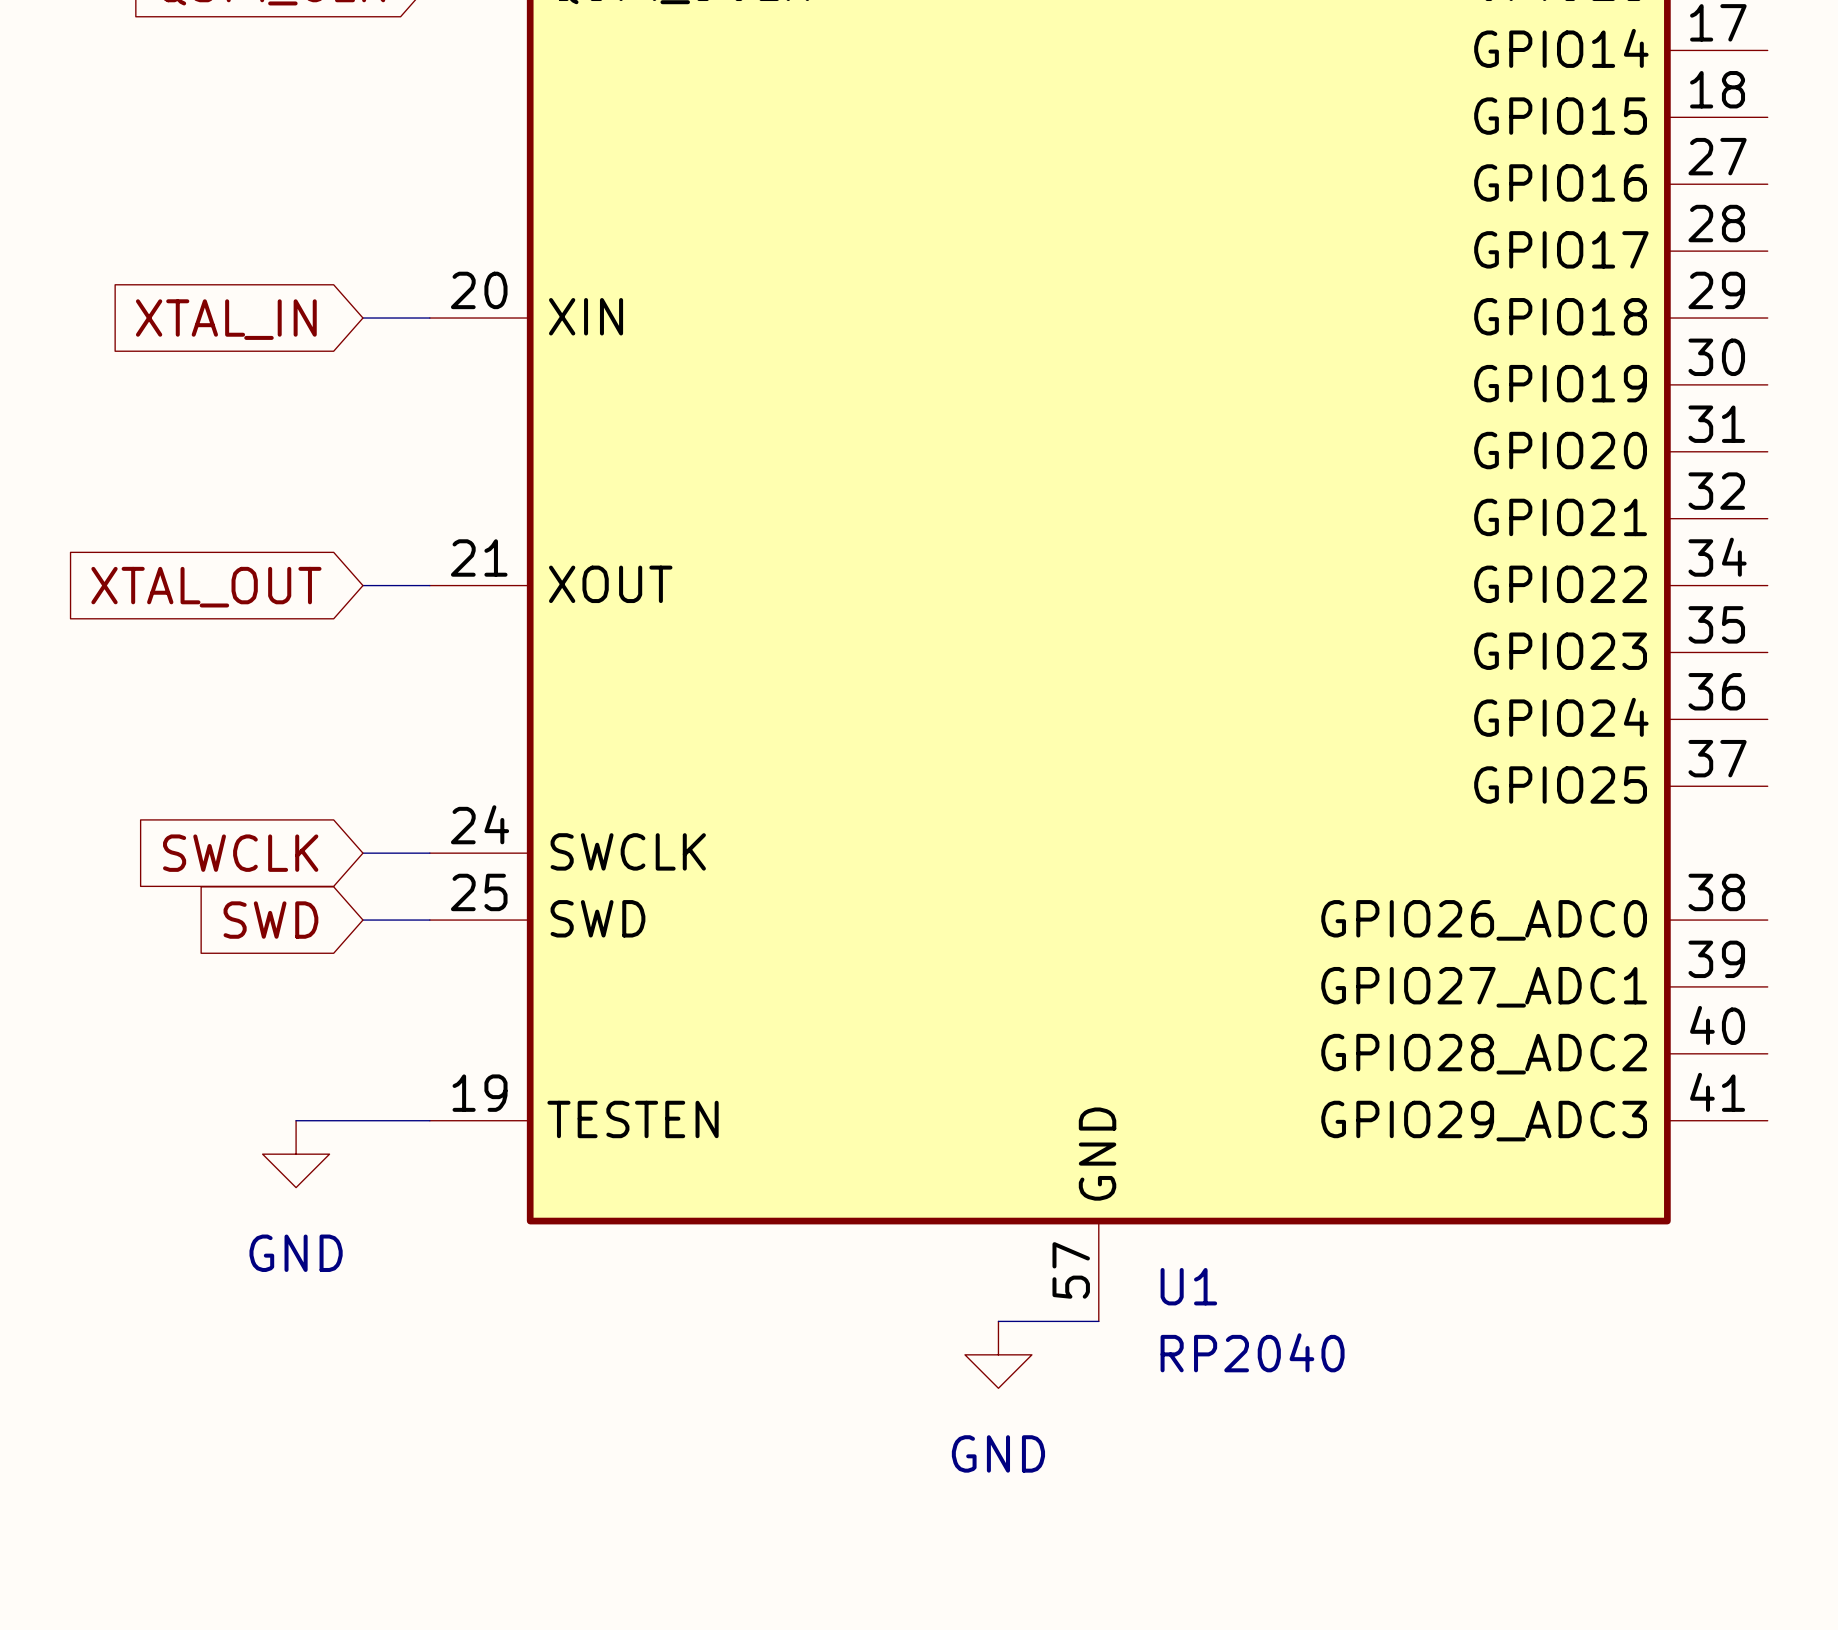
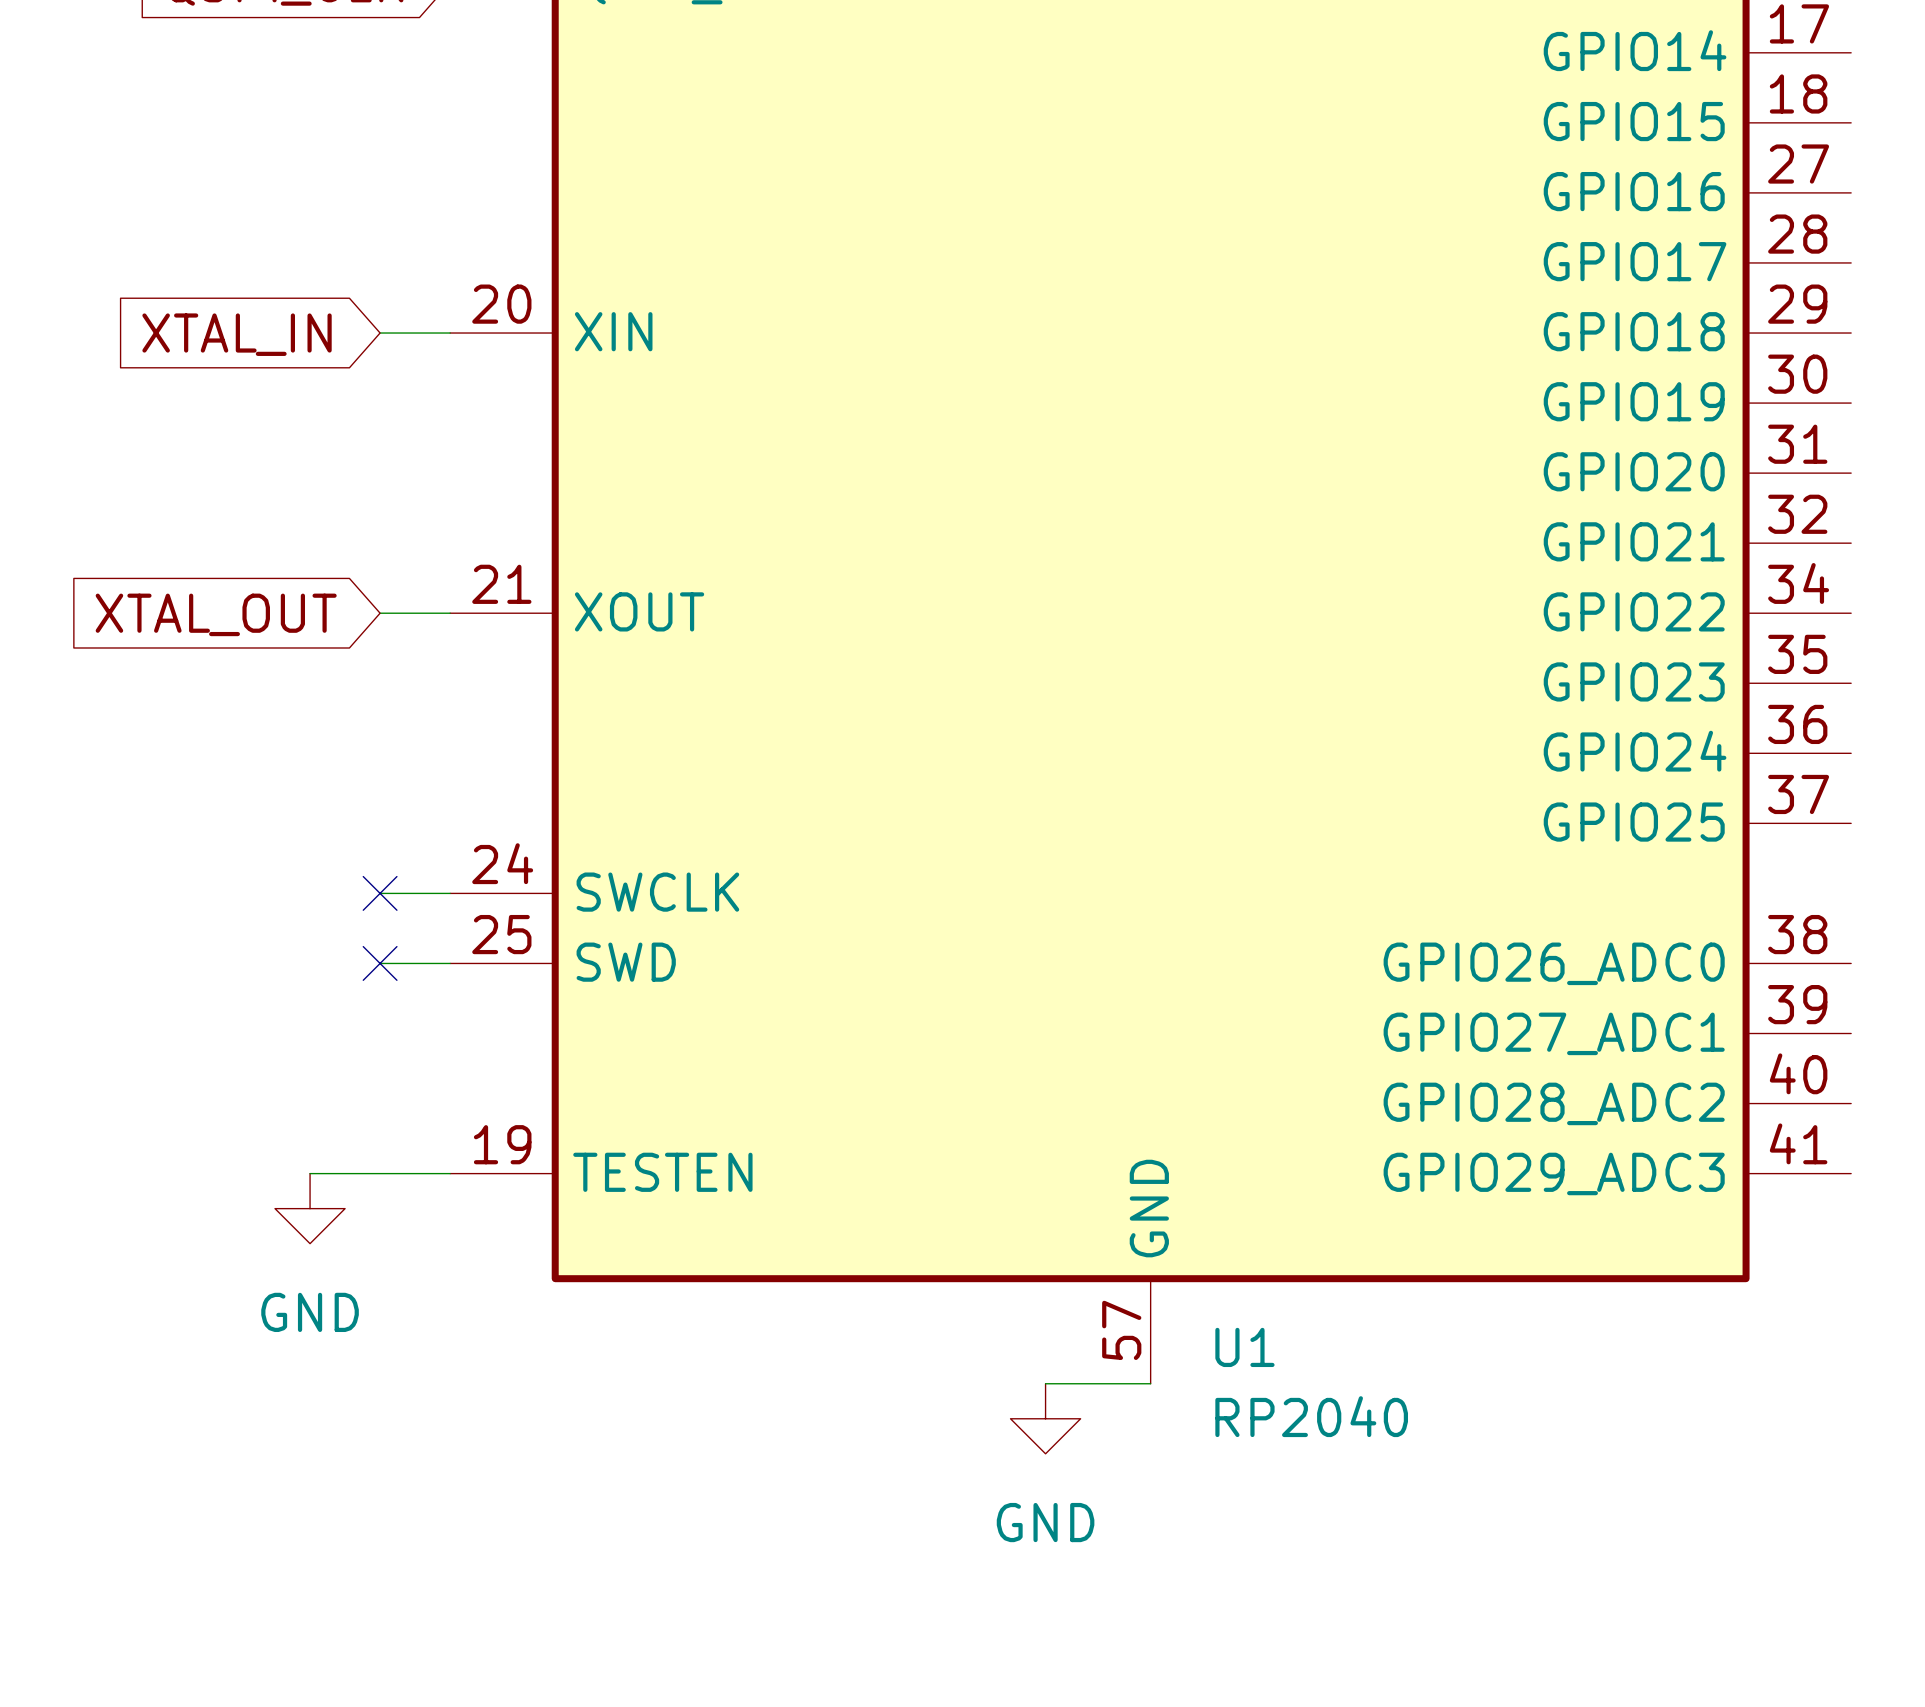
global label: SWCLK (240, 853) -> none
no-connect mark: none -> (380, 893)
global label: SWD (270, 920) -> none
no-connect mark: none -> (380, 963)

